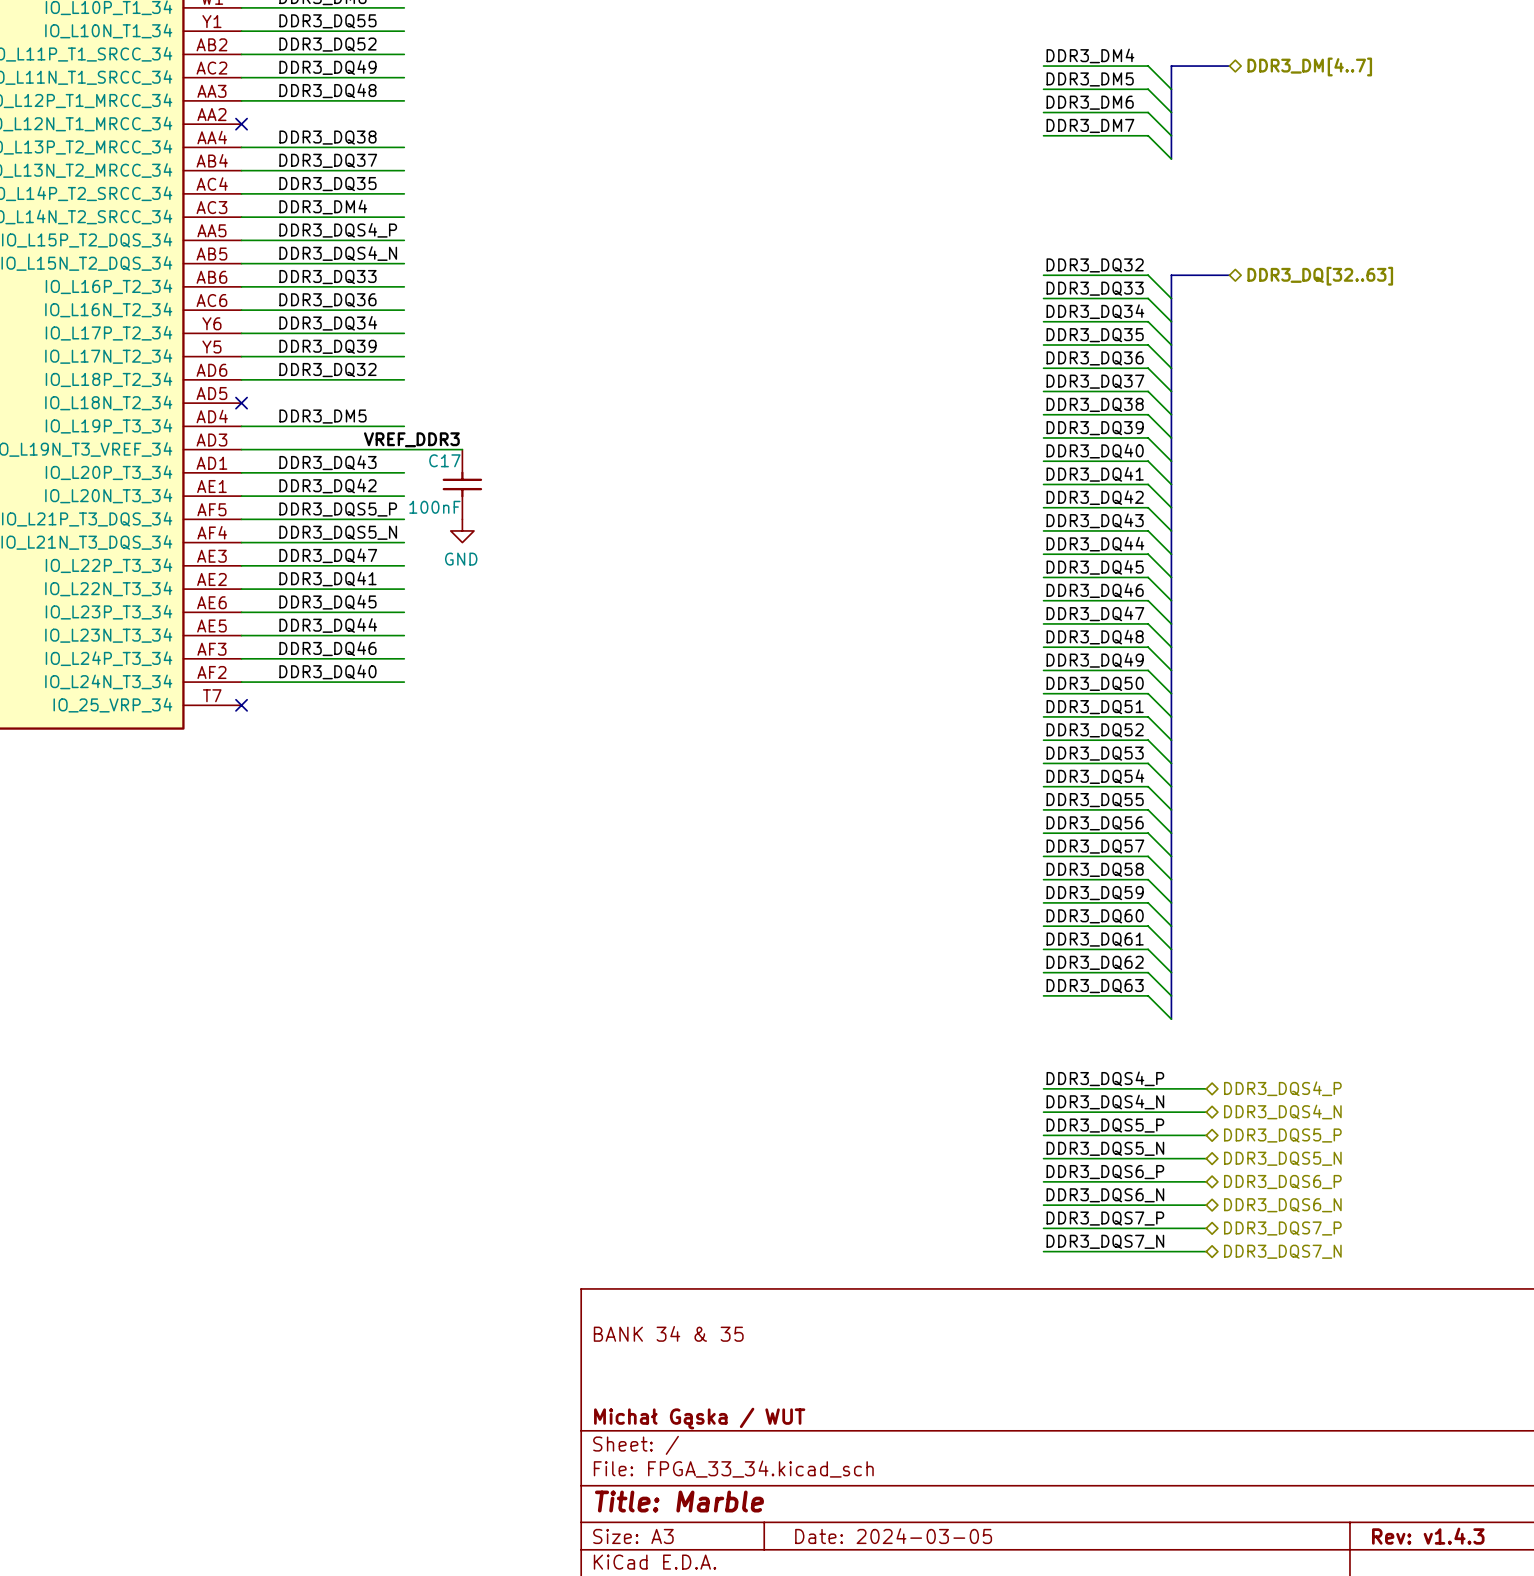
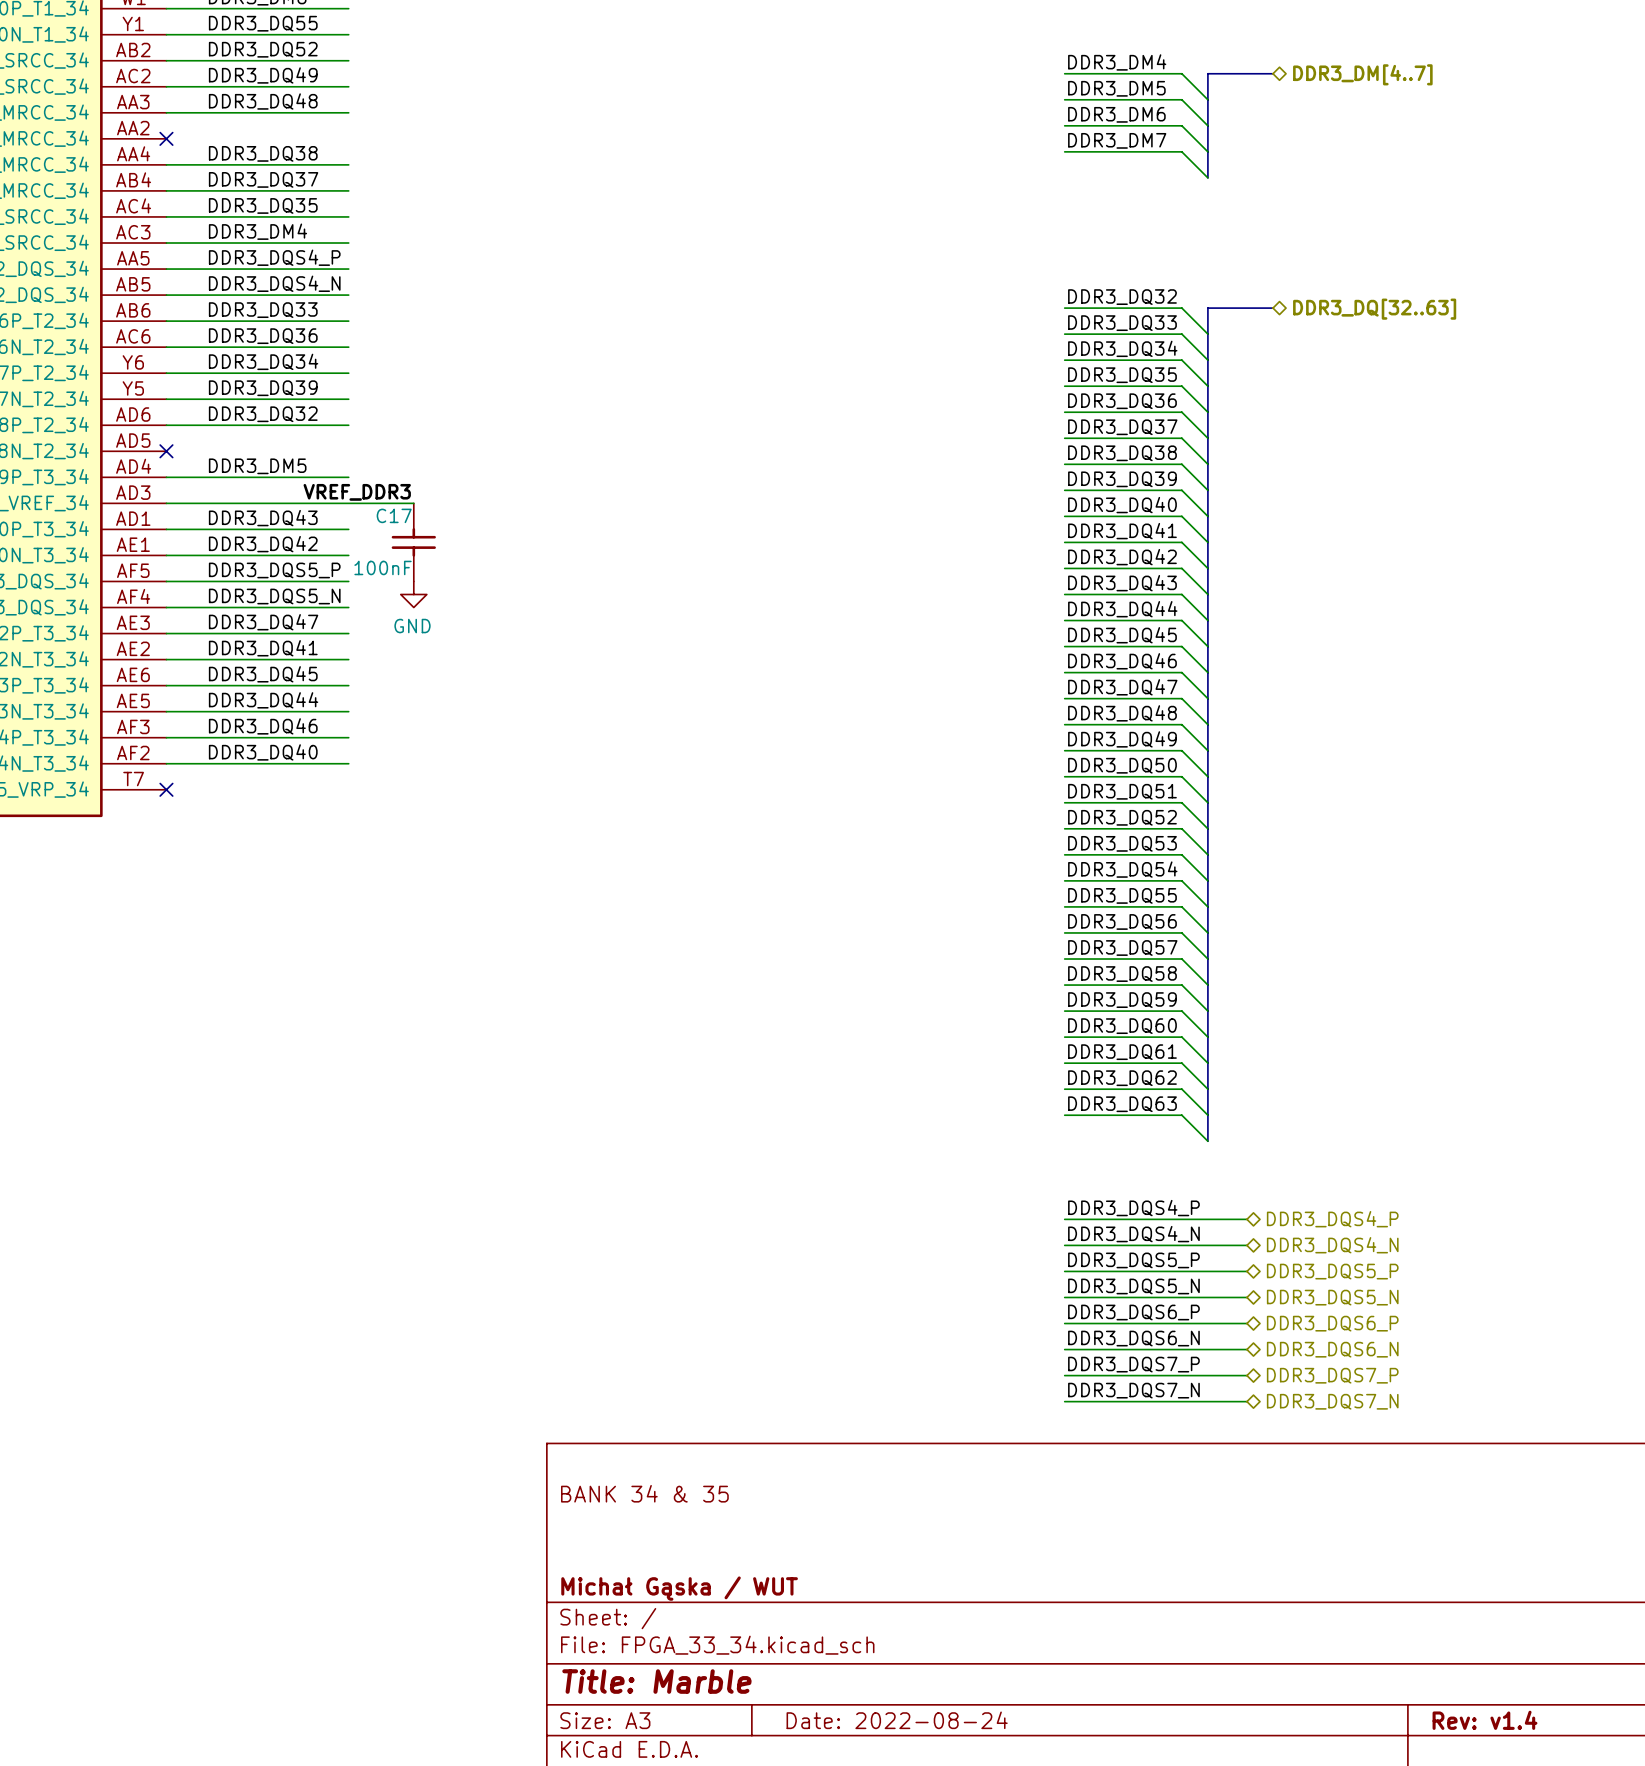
title block: Date: 2024-03-05 (893, 1536) -> Date: 2022-08-24 (897, 1720)
title block: Rev: v1.4.3 (1428, 1536) -> Rev: v1.4 (1484, 1720)

